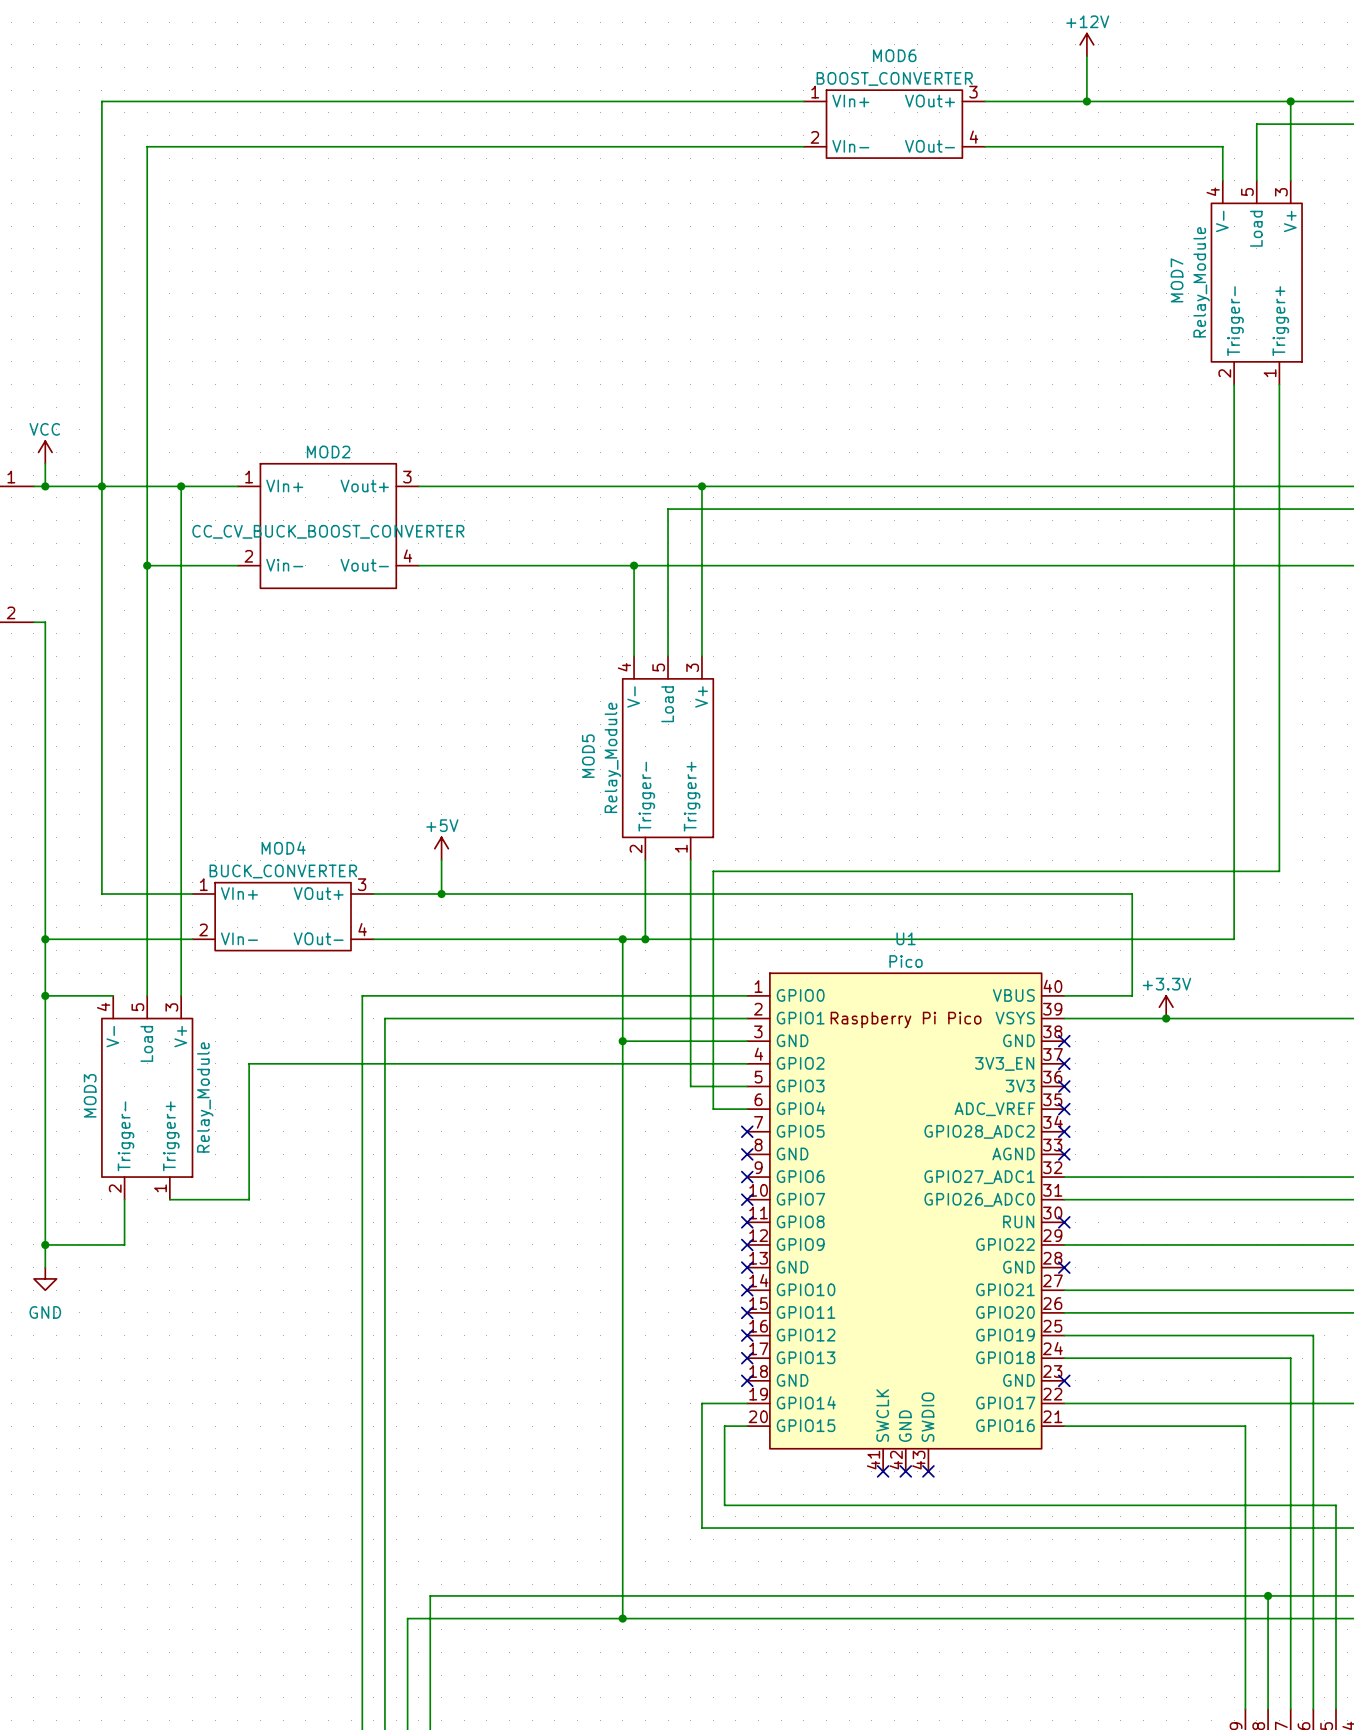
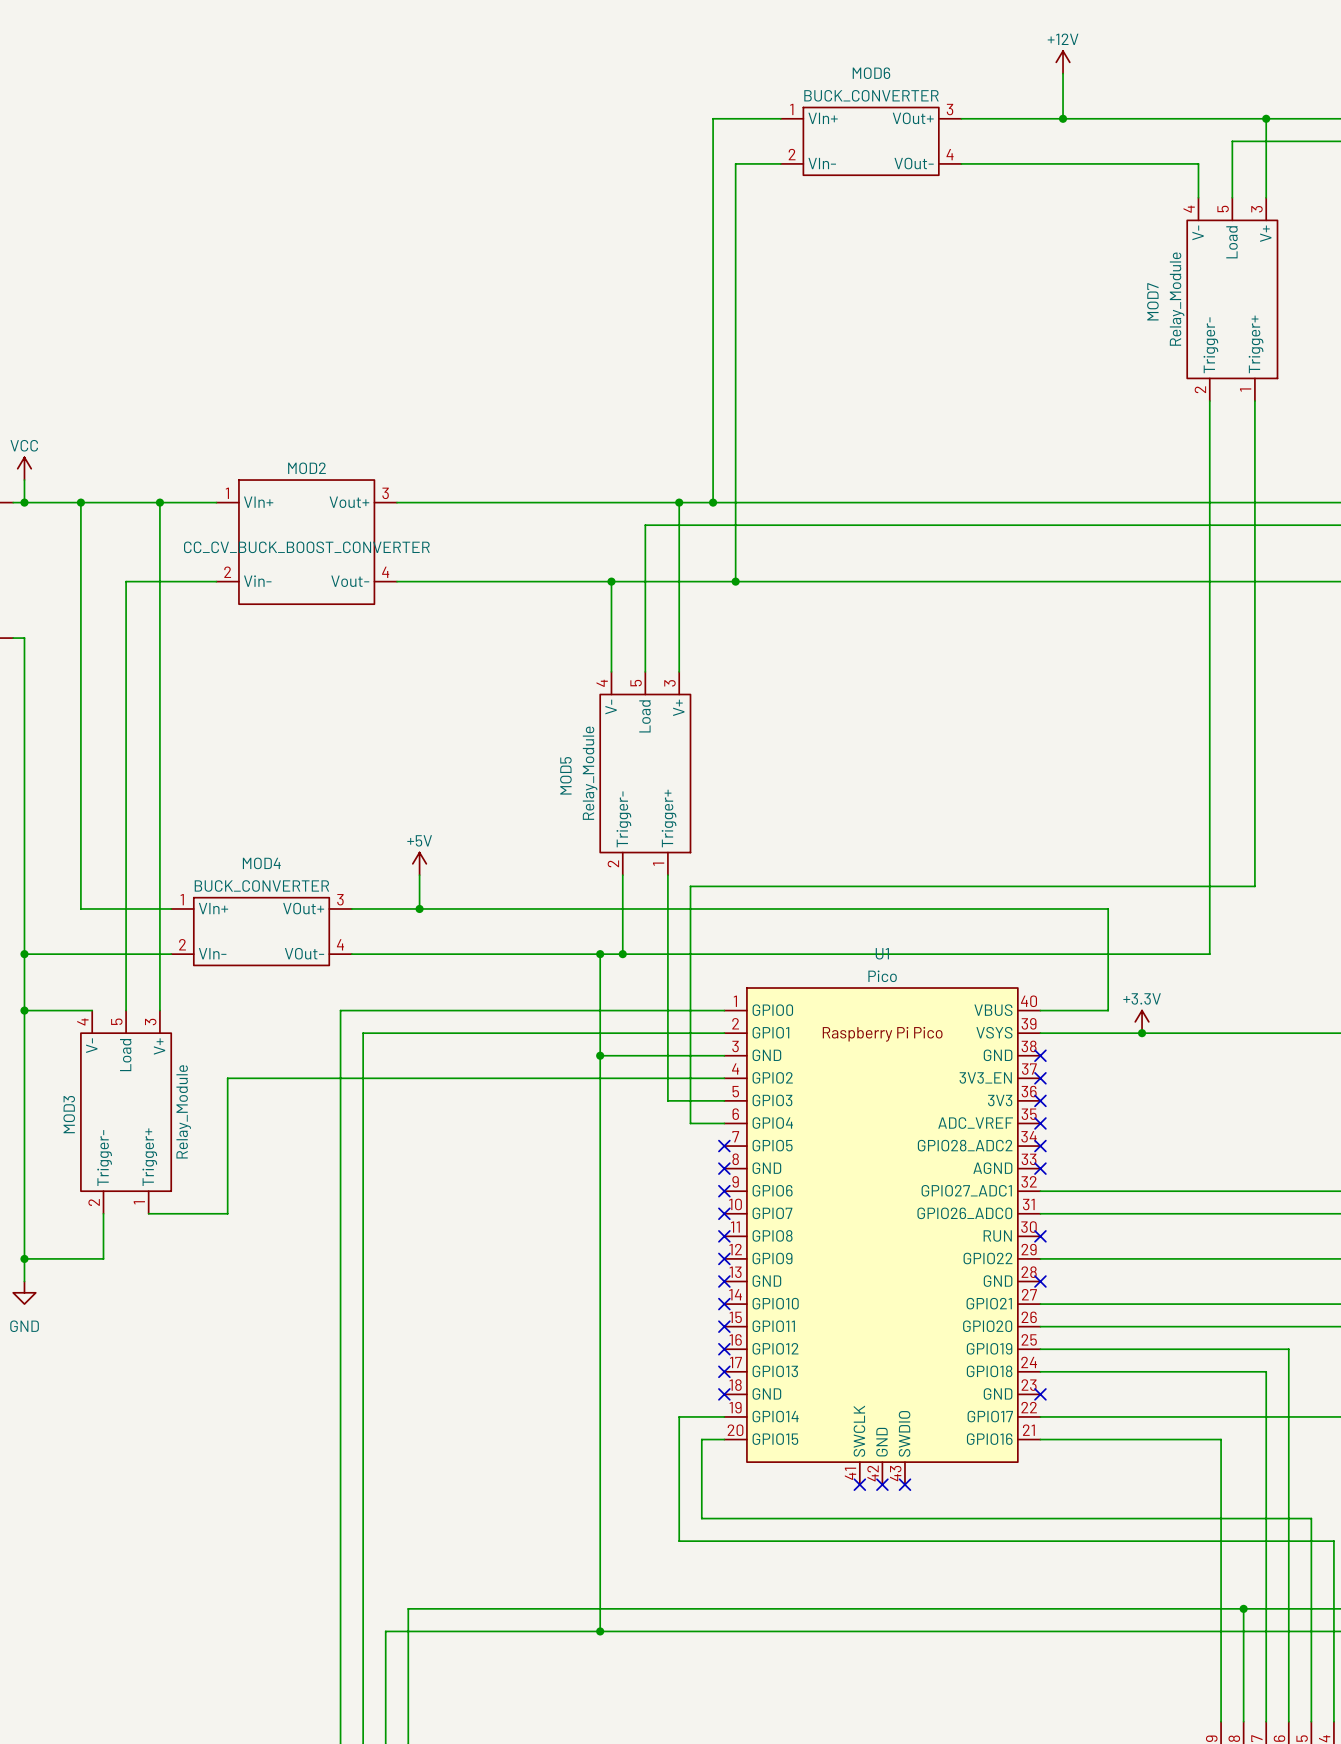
MOD6 value: BOOST_CONVERTER (894, 78) -> BUCK_CONVERTER (871, 95)
wire: (735, 101) (101, 101) (101, 486) -> (713, 118) (713, 502)
wire: (758, 146) (147, 146) (147, 565) -> (735, 163) (735, 581)
junction: none -> (713, 502)
junction: (147, 565) -> none
junction: none -> (735, 581)

